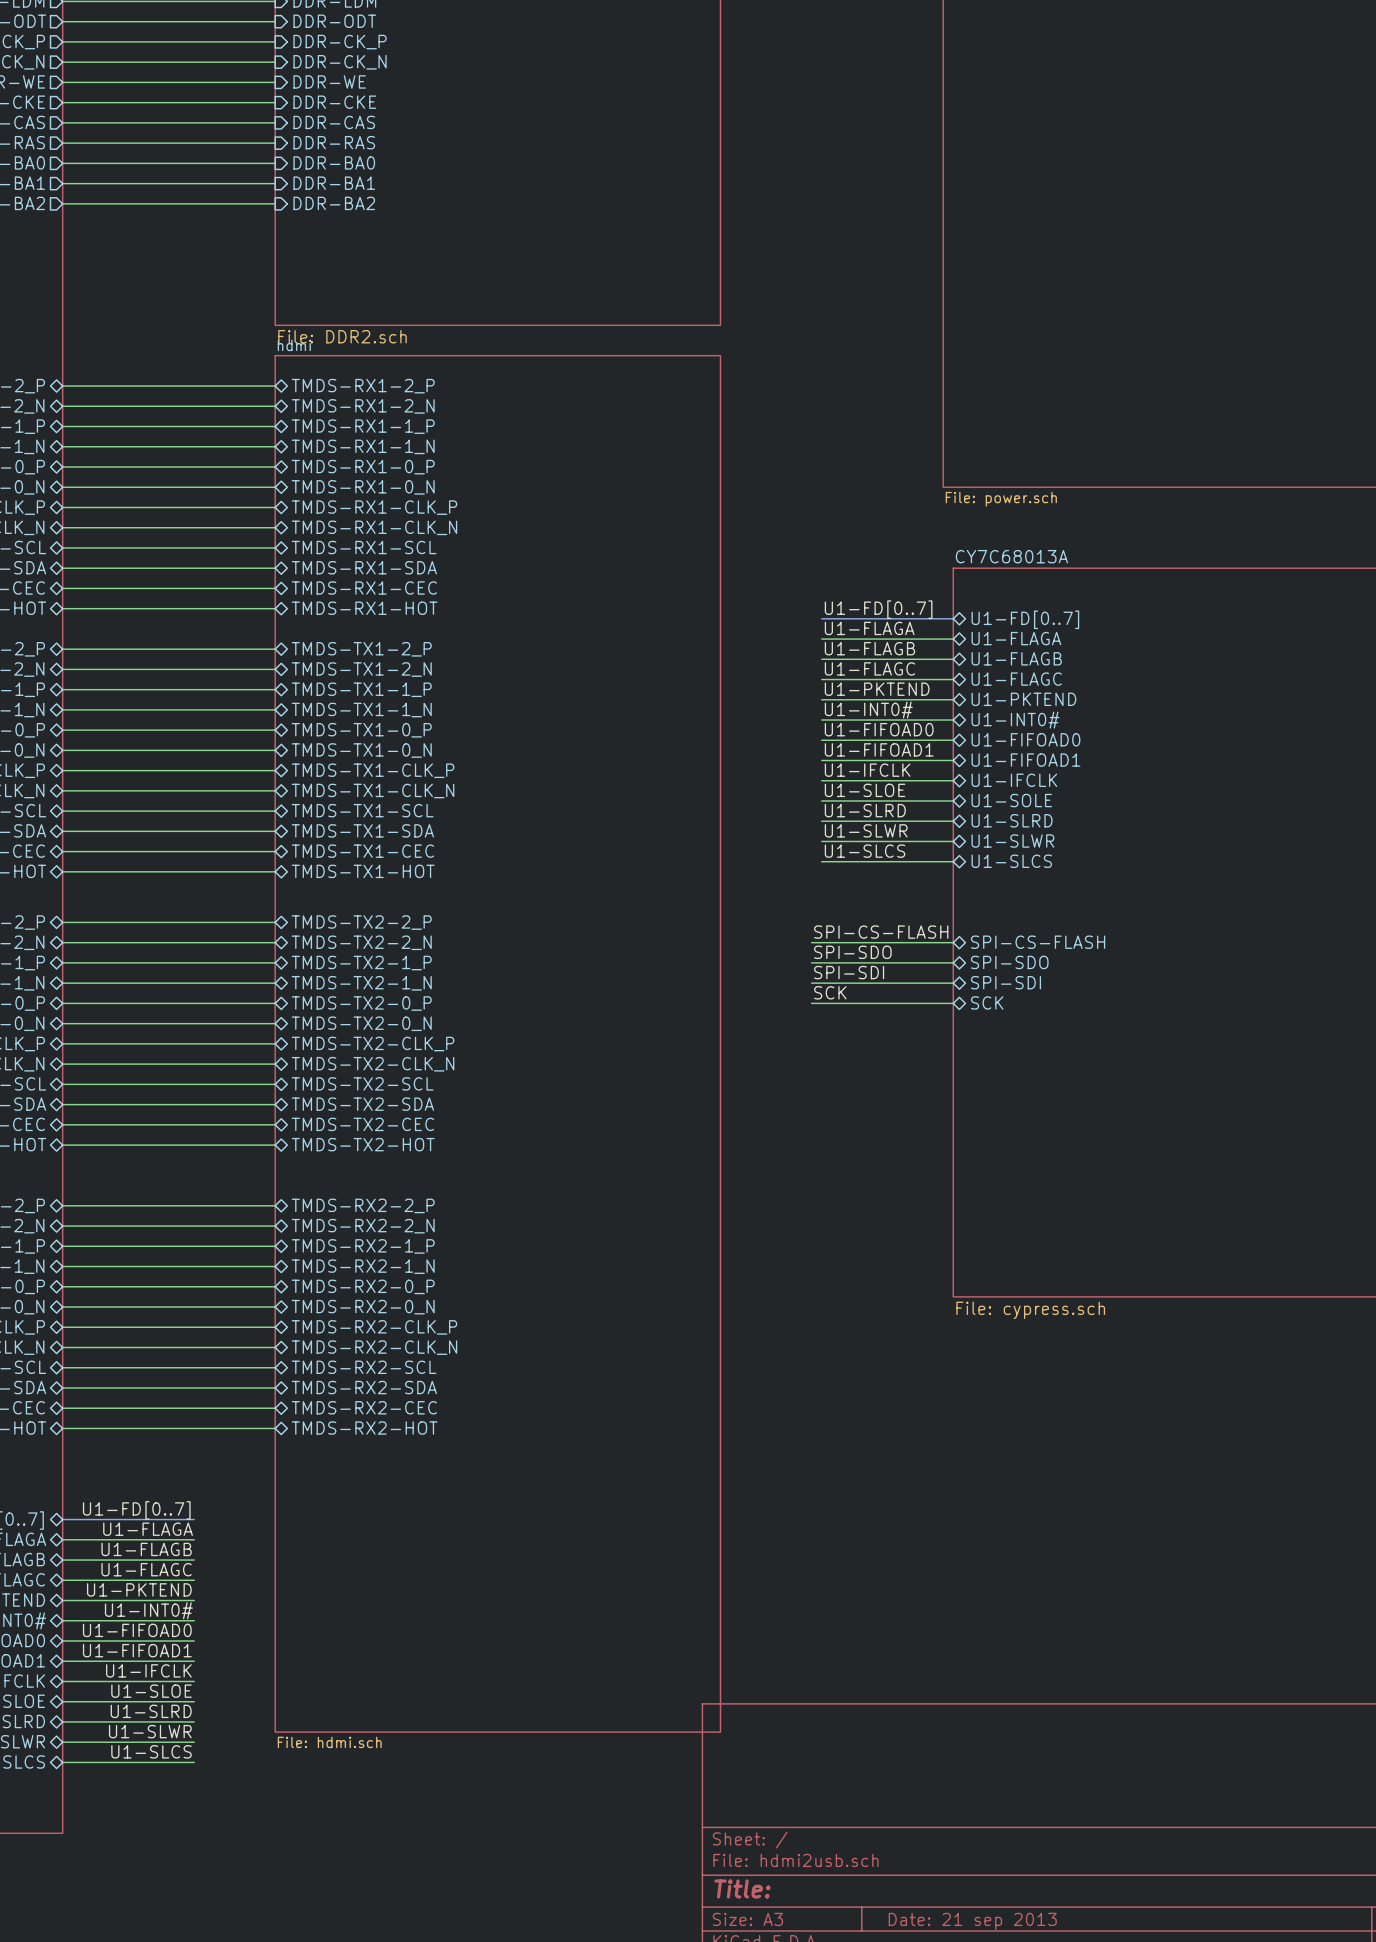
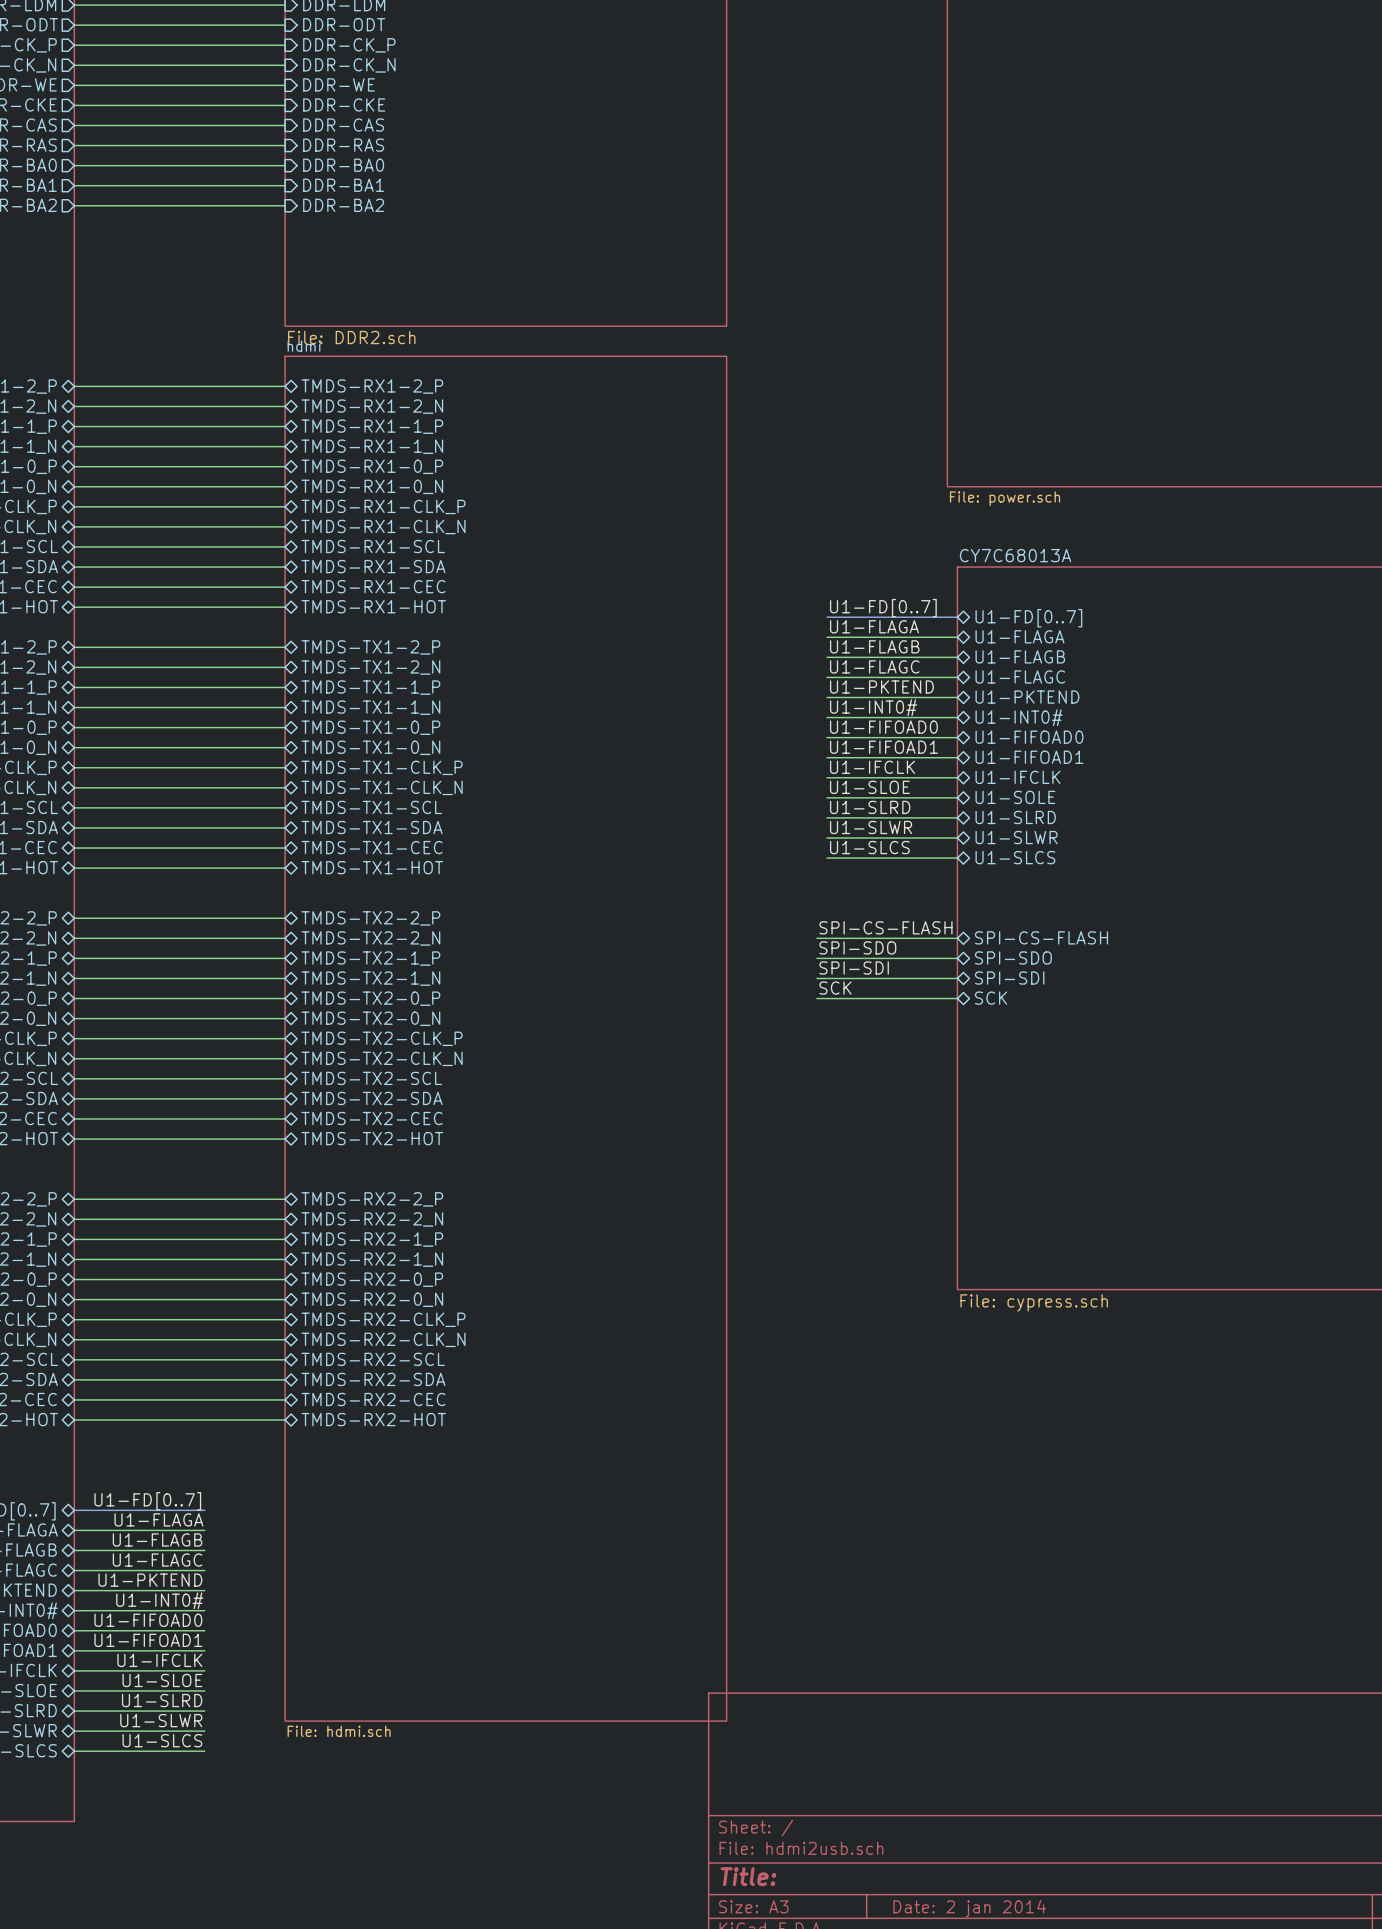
title block: Date: 21 sep 2013 (972, 1921) -> Date: 2 jan 2014 (969, 1908)

